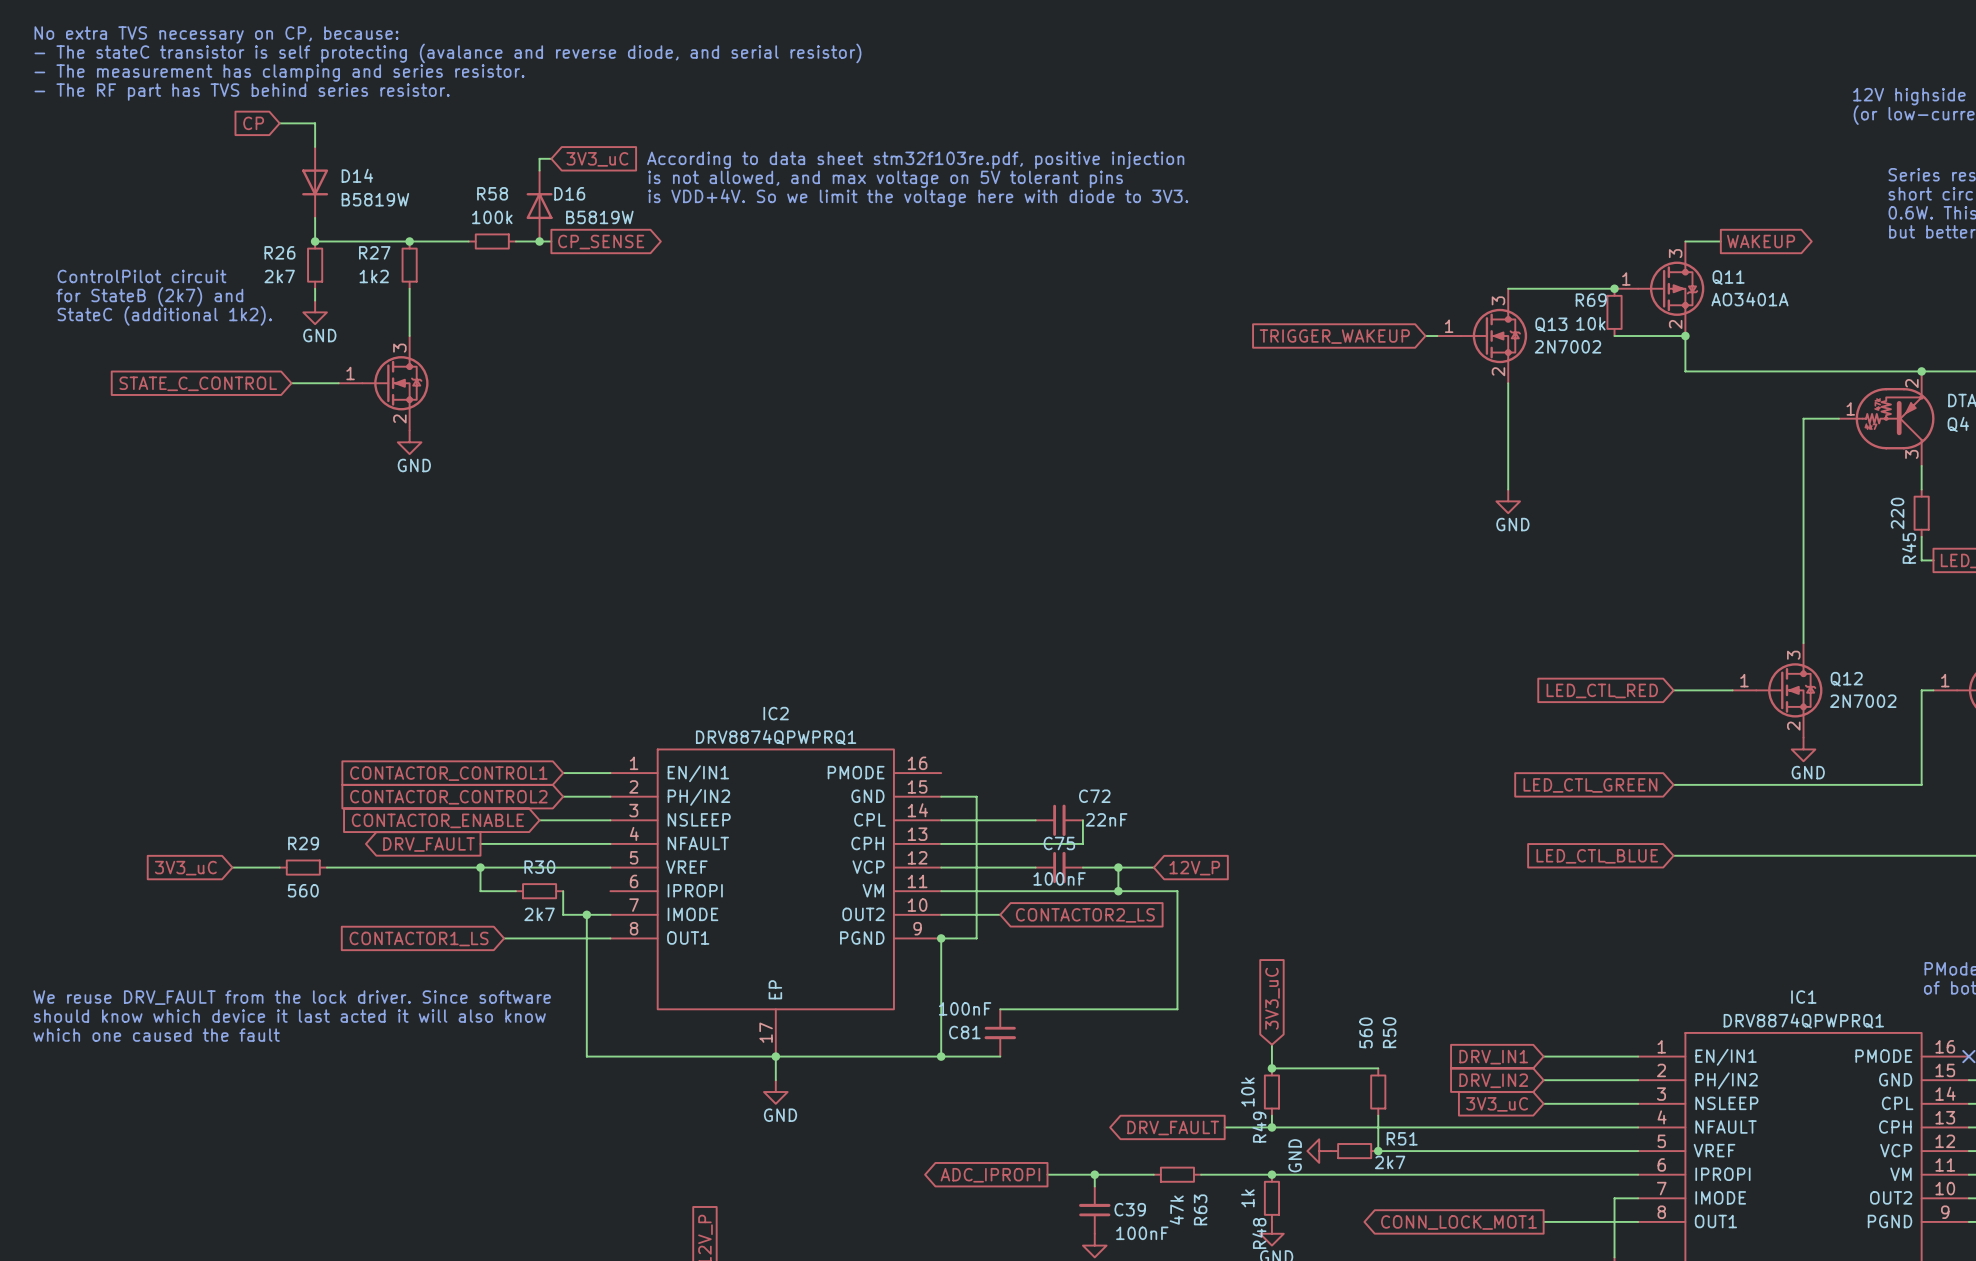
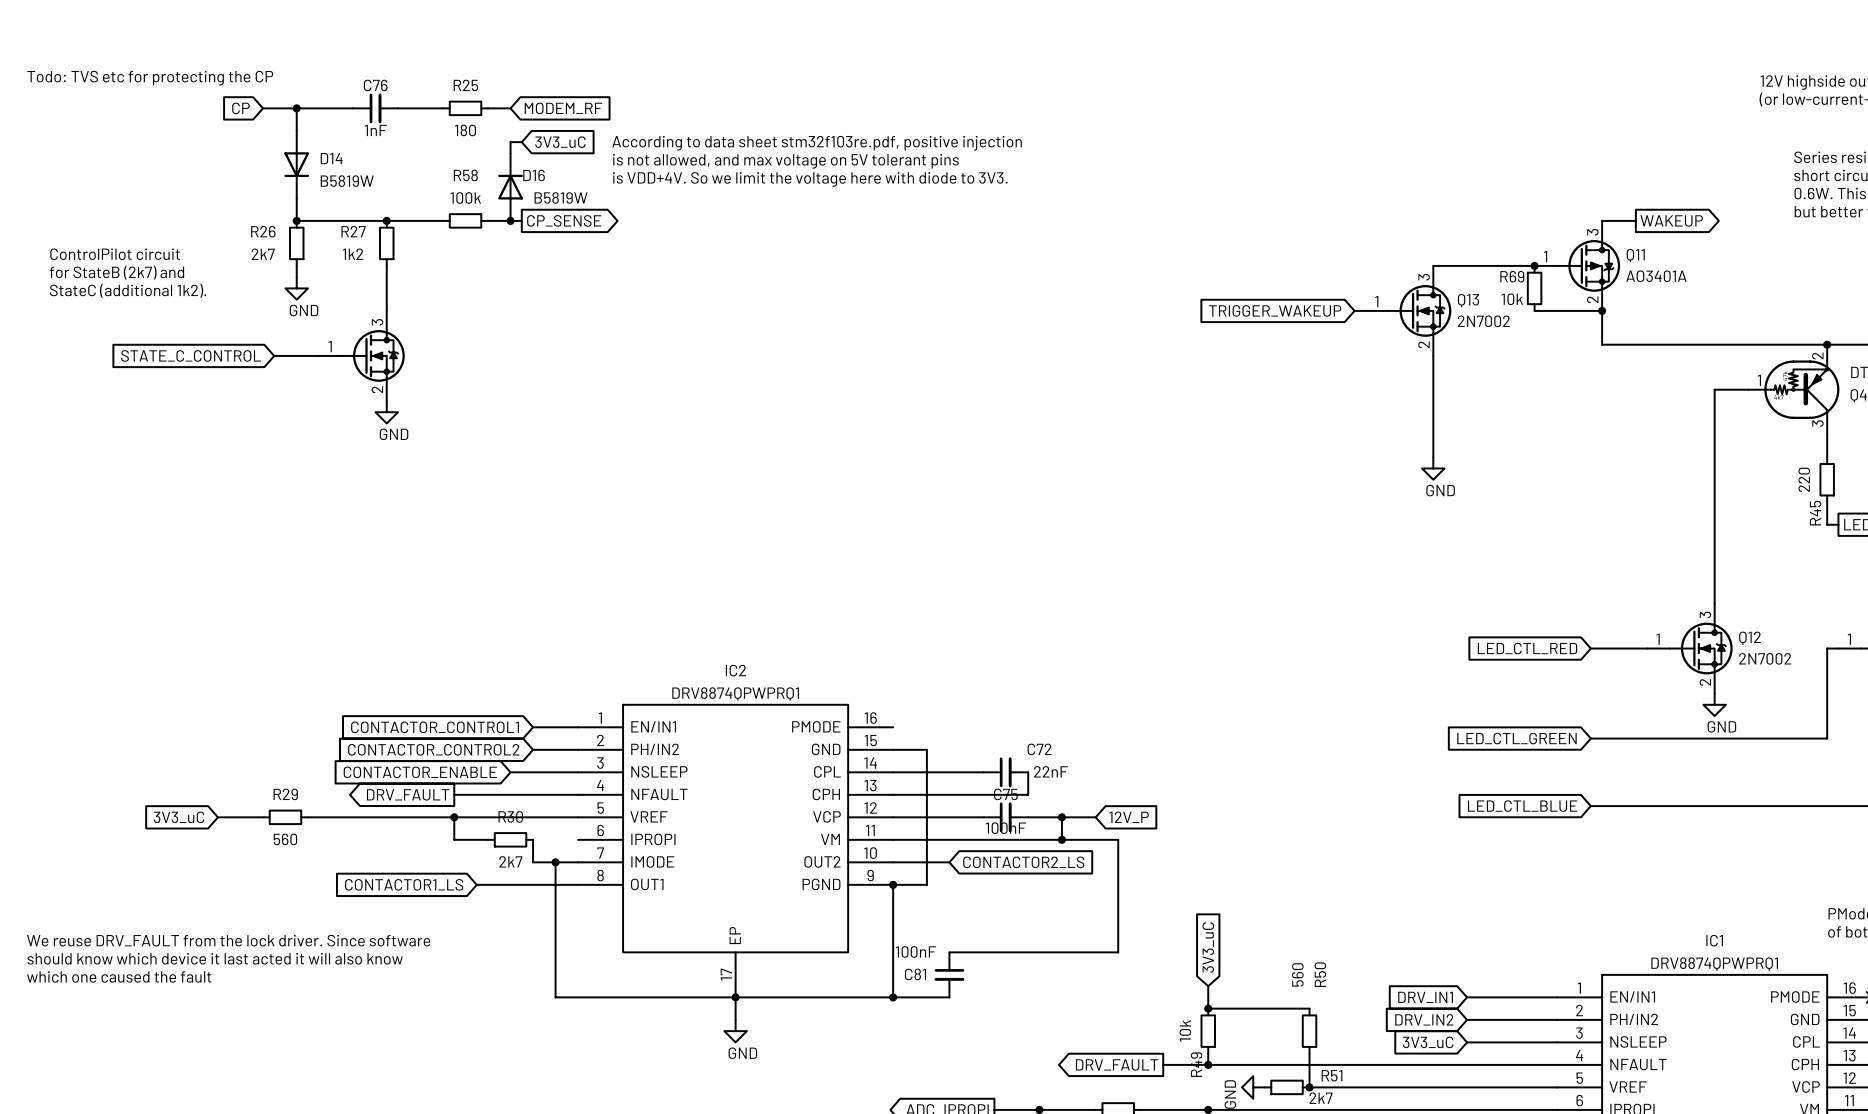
text: No extra TVS necessary on CP, because: (216, 34) -> none
text: - The stateC transistor is self protecting (avalance and reverse diode, and serial resistor) (447, 53) -> none
text: - The measurement has clamping and series resistor. (279, 73) -> none
text: - The RF part has TVS behind series resistor. (242, 92) -> Todo: TVS etc for protecting the CP (150, 78)
wire: none -> (296, 108) (353, 108)
junction: none -> (296, 108)
C76: none -> 1nF (375, 108)
wire: none -> (398, 108) (443, 108)
R25: none -> 180 (465, 108)
wire: none -> (488, 108) (510, 108)
global label: none -> MODEM_RF (563, 108)

